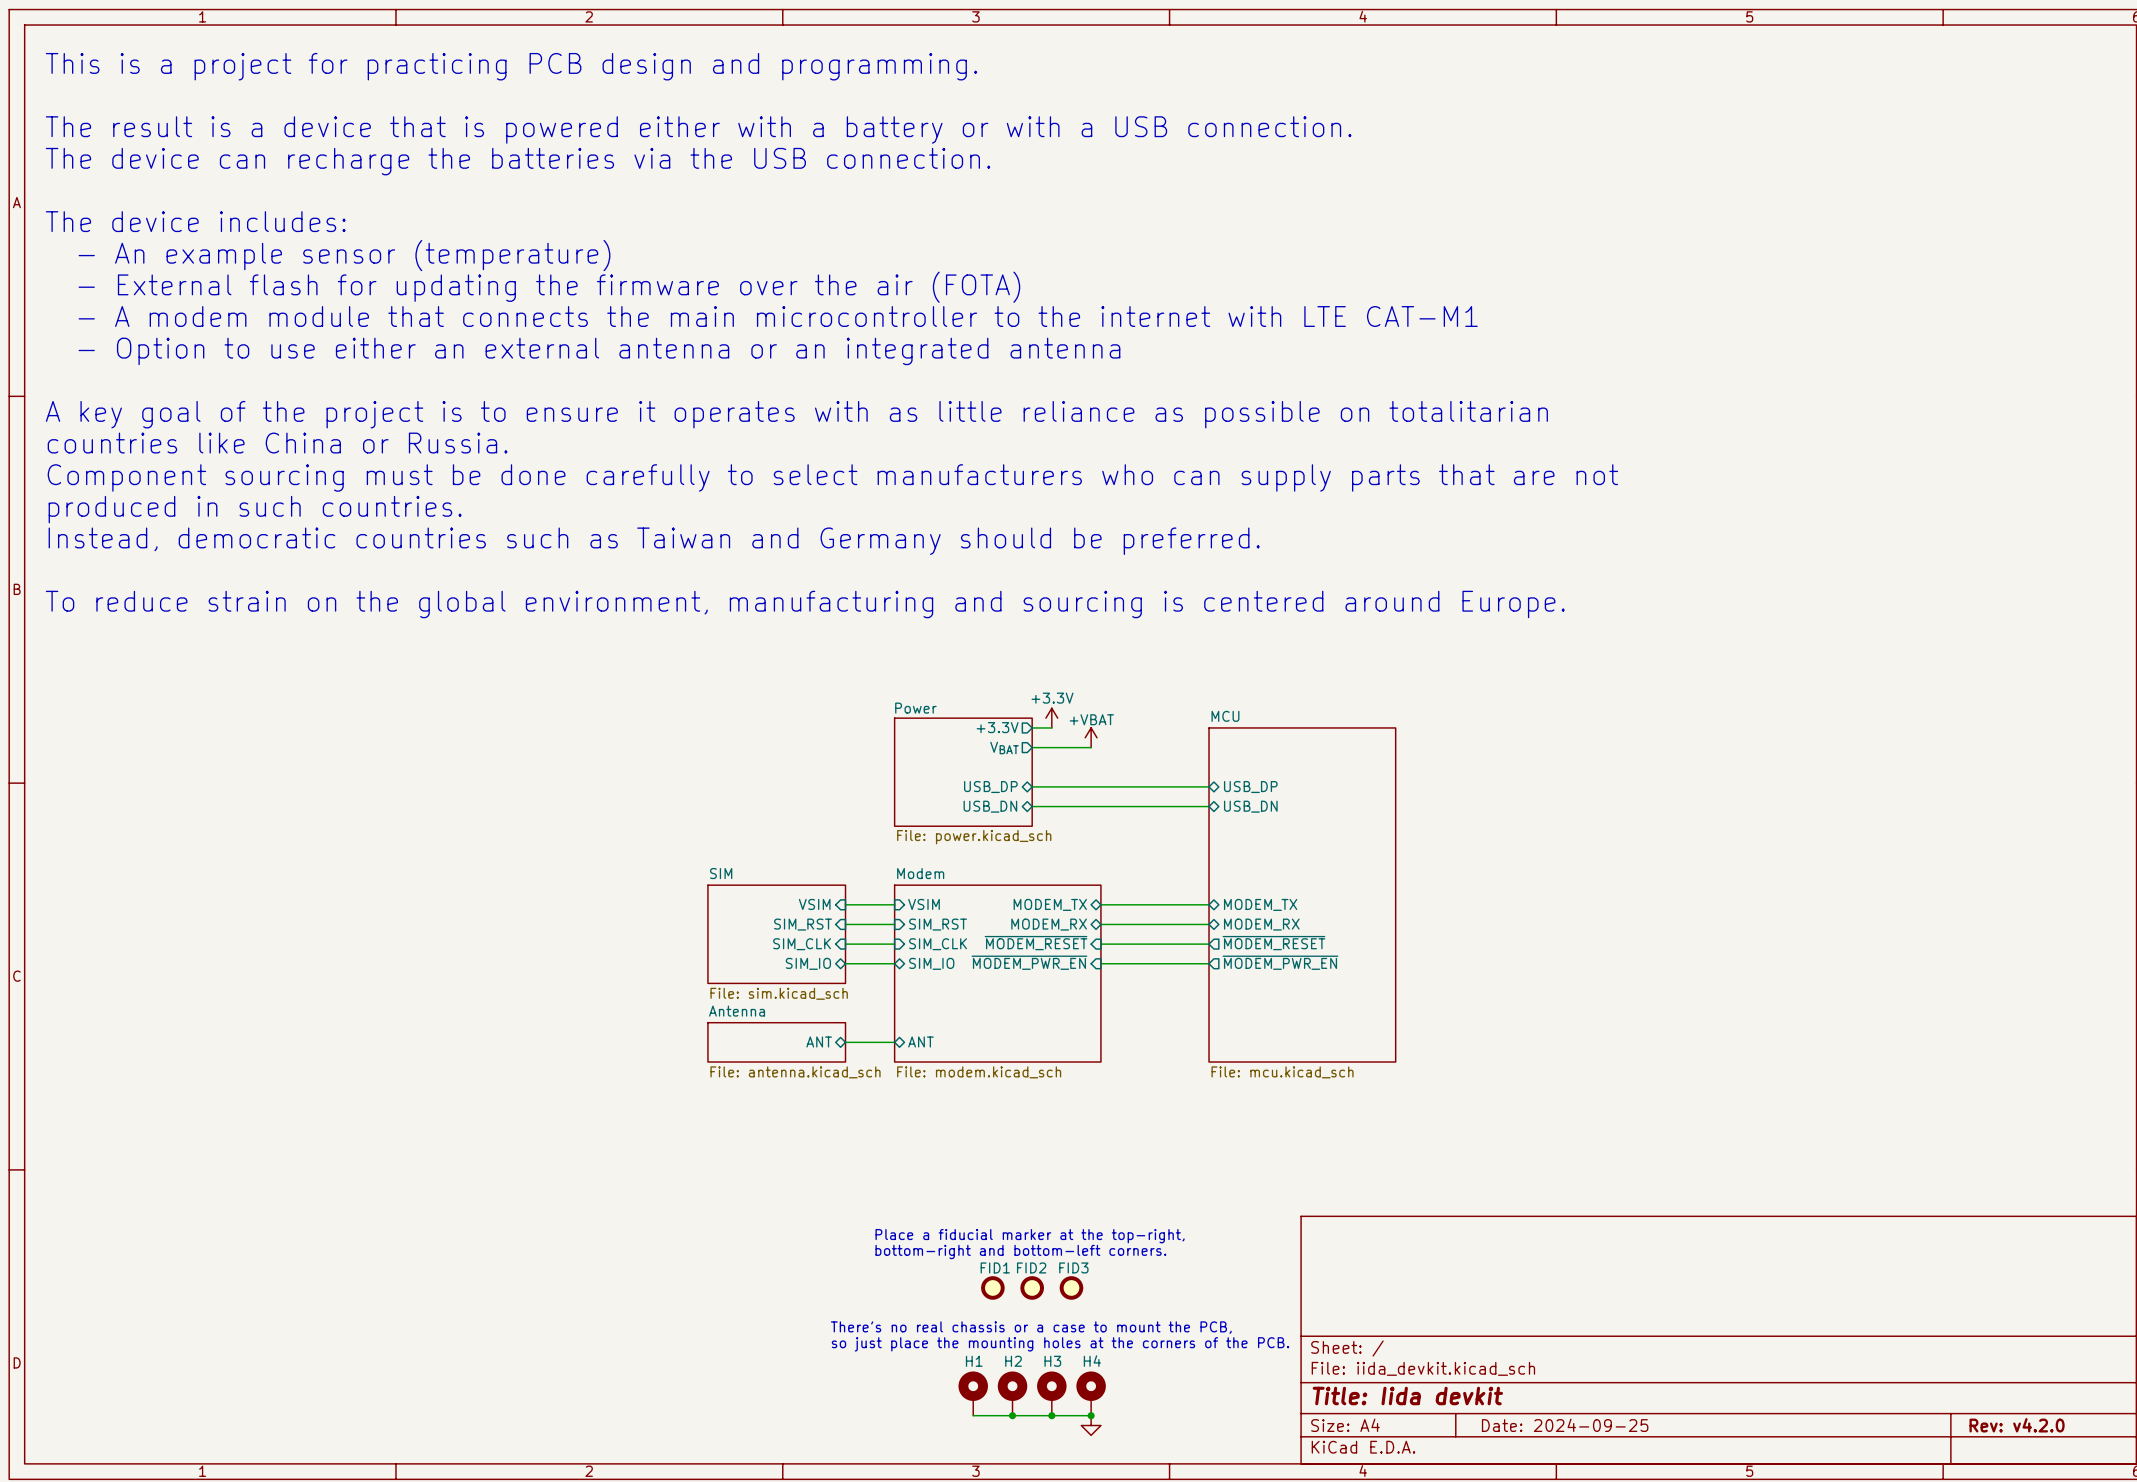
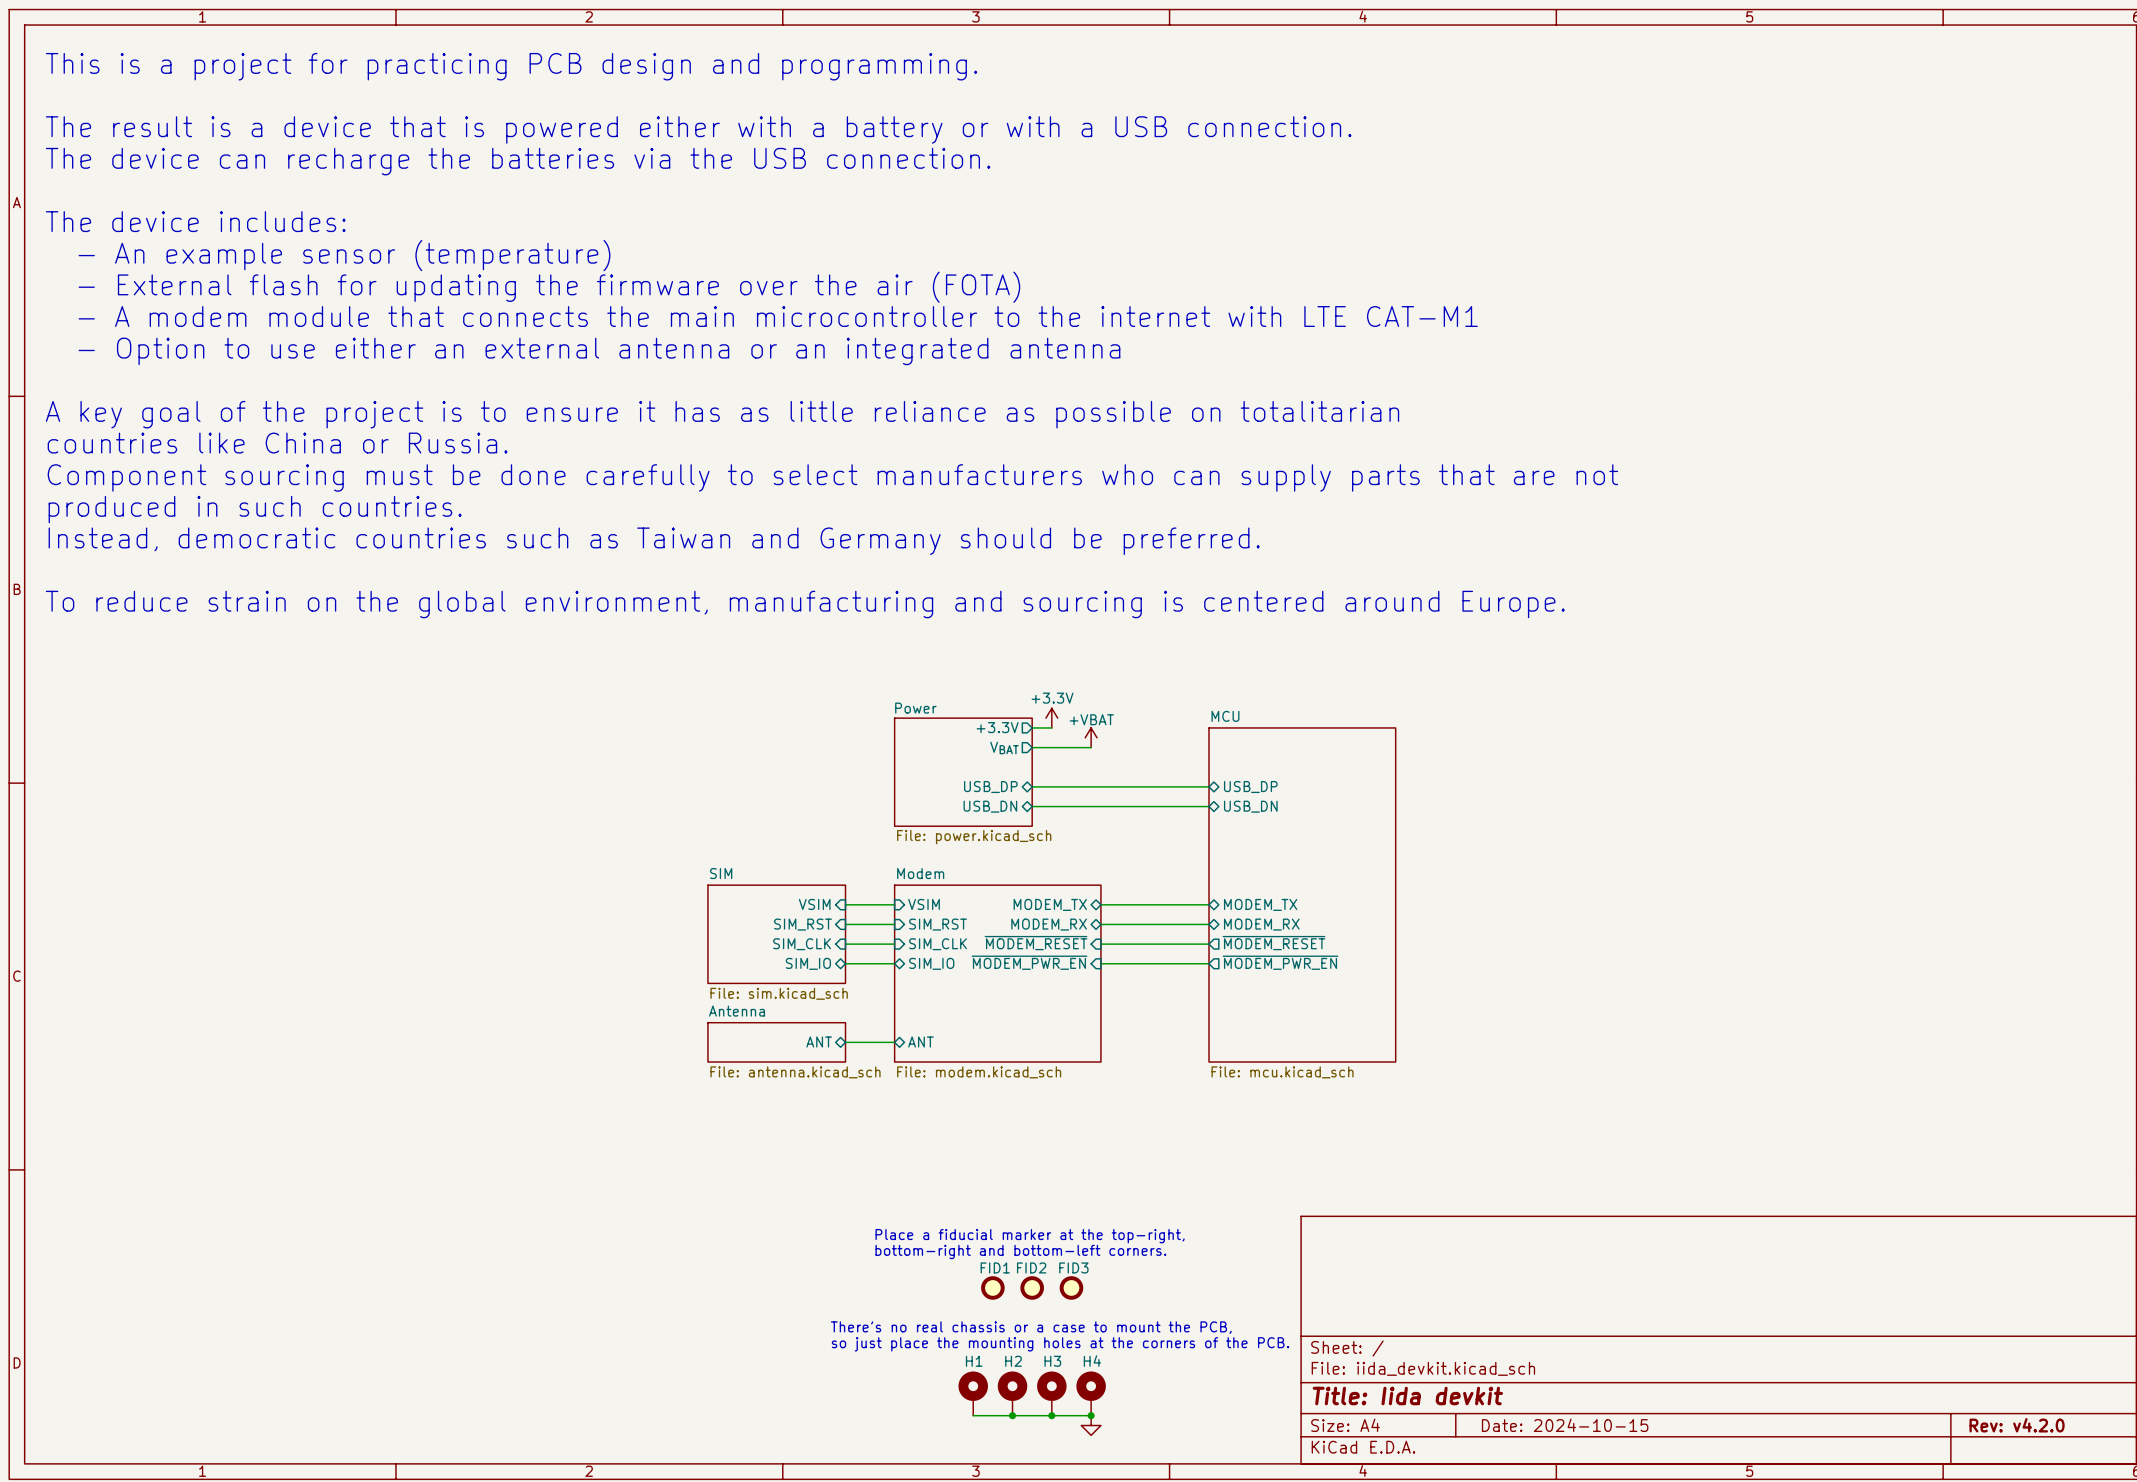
text: A key goal of the project is to ensure it operates with as little reliance as possible on totalitarian (796, 414) -> A key goal of the project is to ensure it has as little reliance as possible on totalitarian (722, 414)
title block: Date: 2024-09-25 (1565, 1425) -> Date: 2024-10-15 (1565, 1425)

